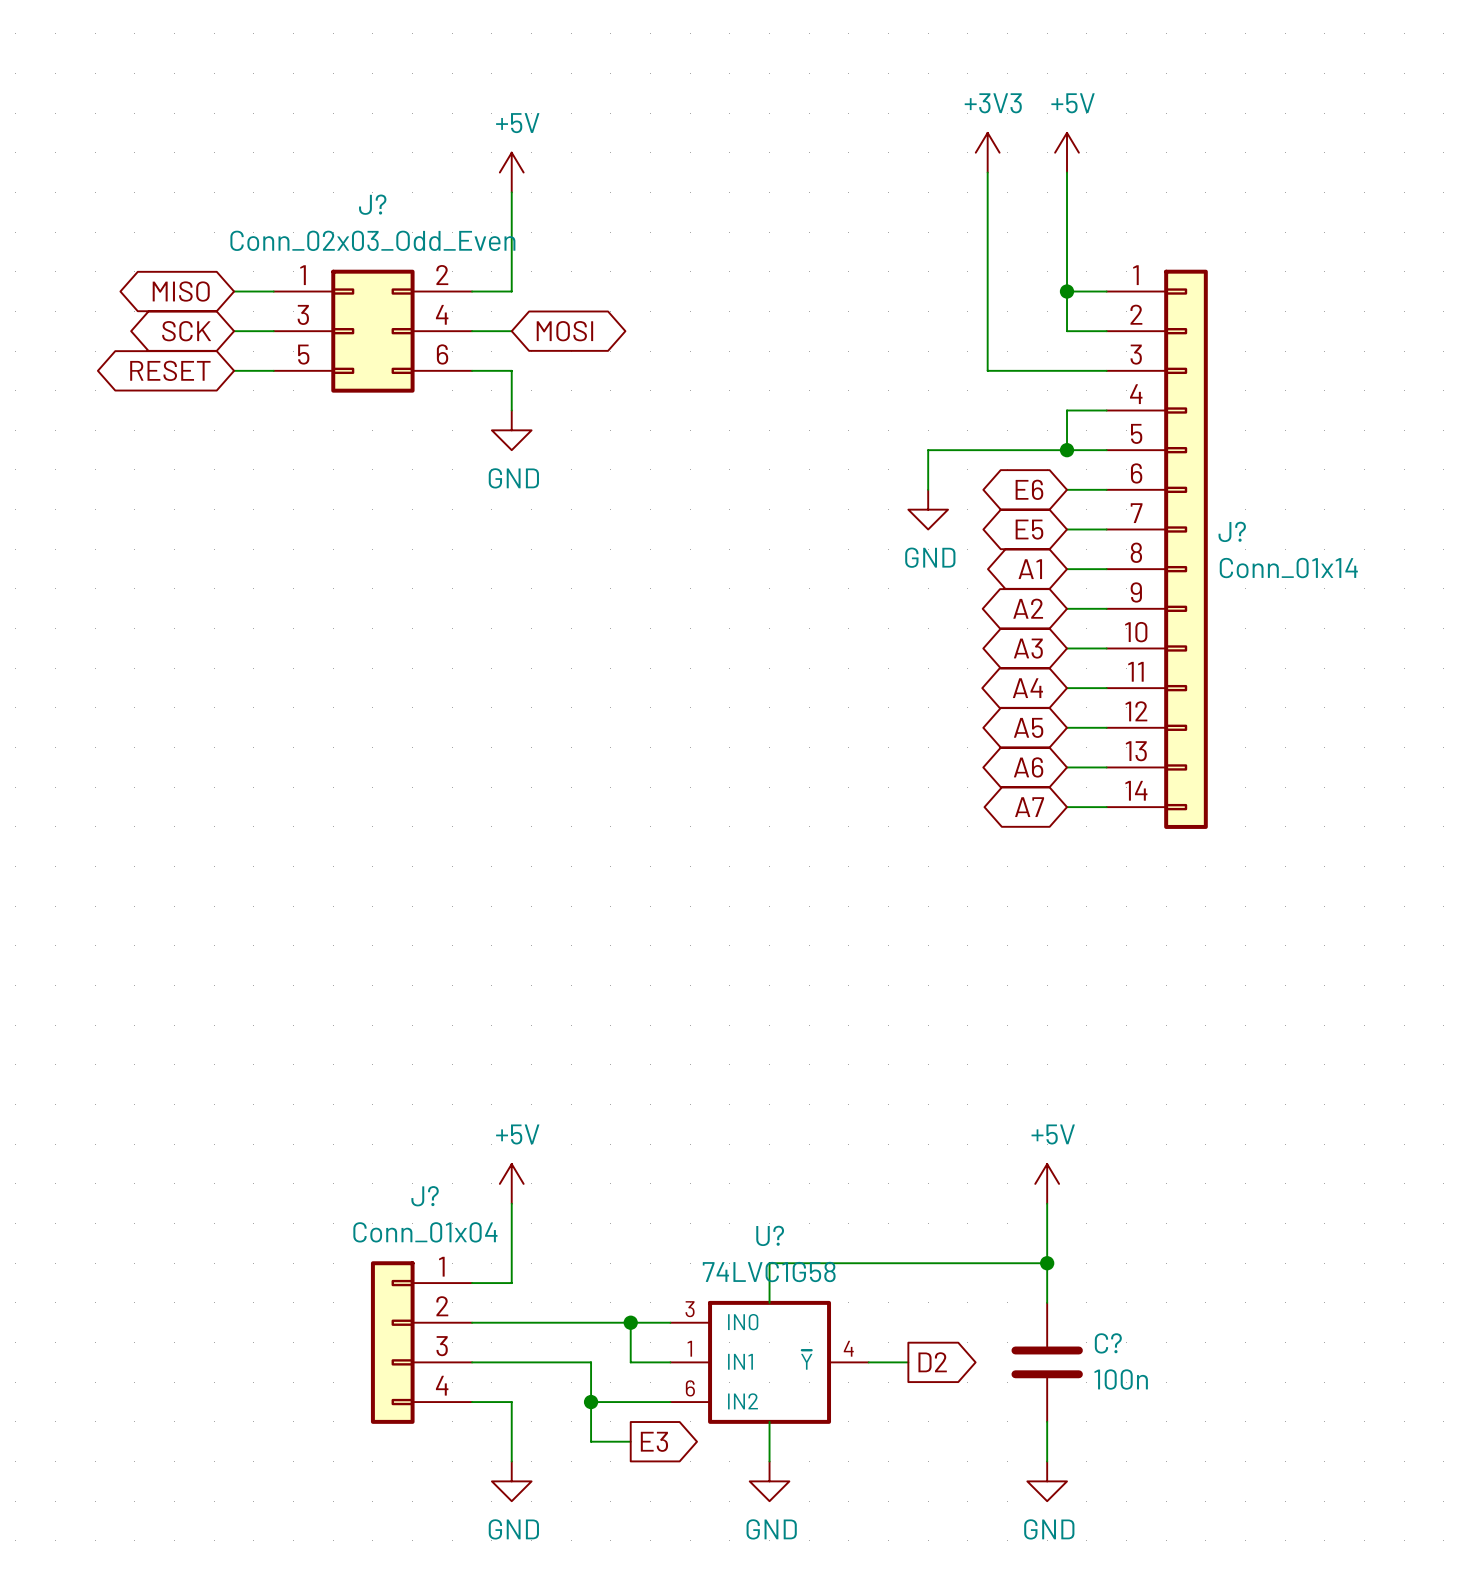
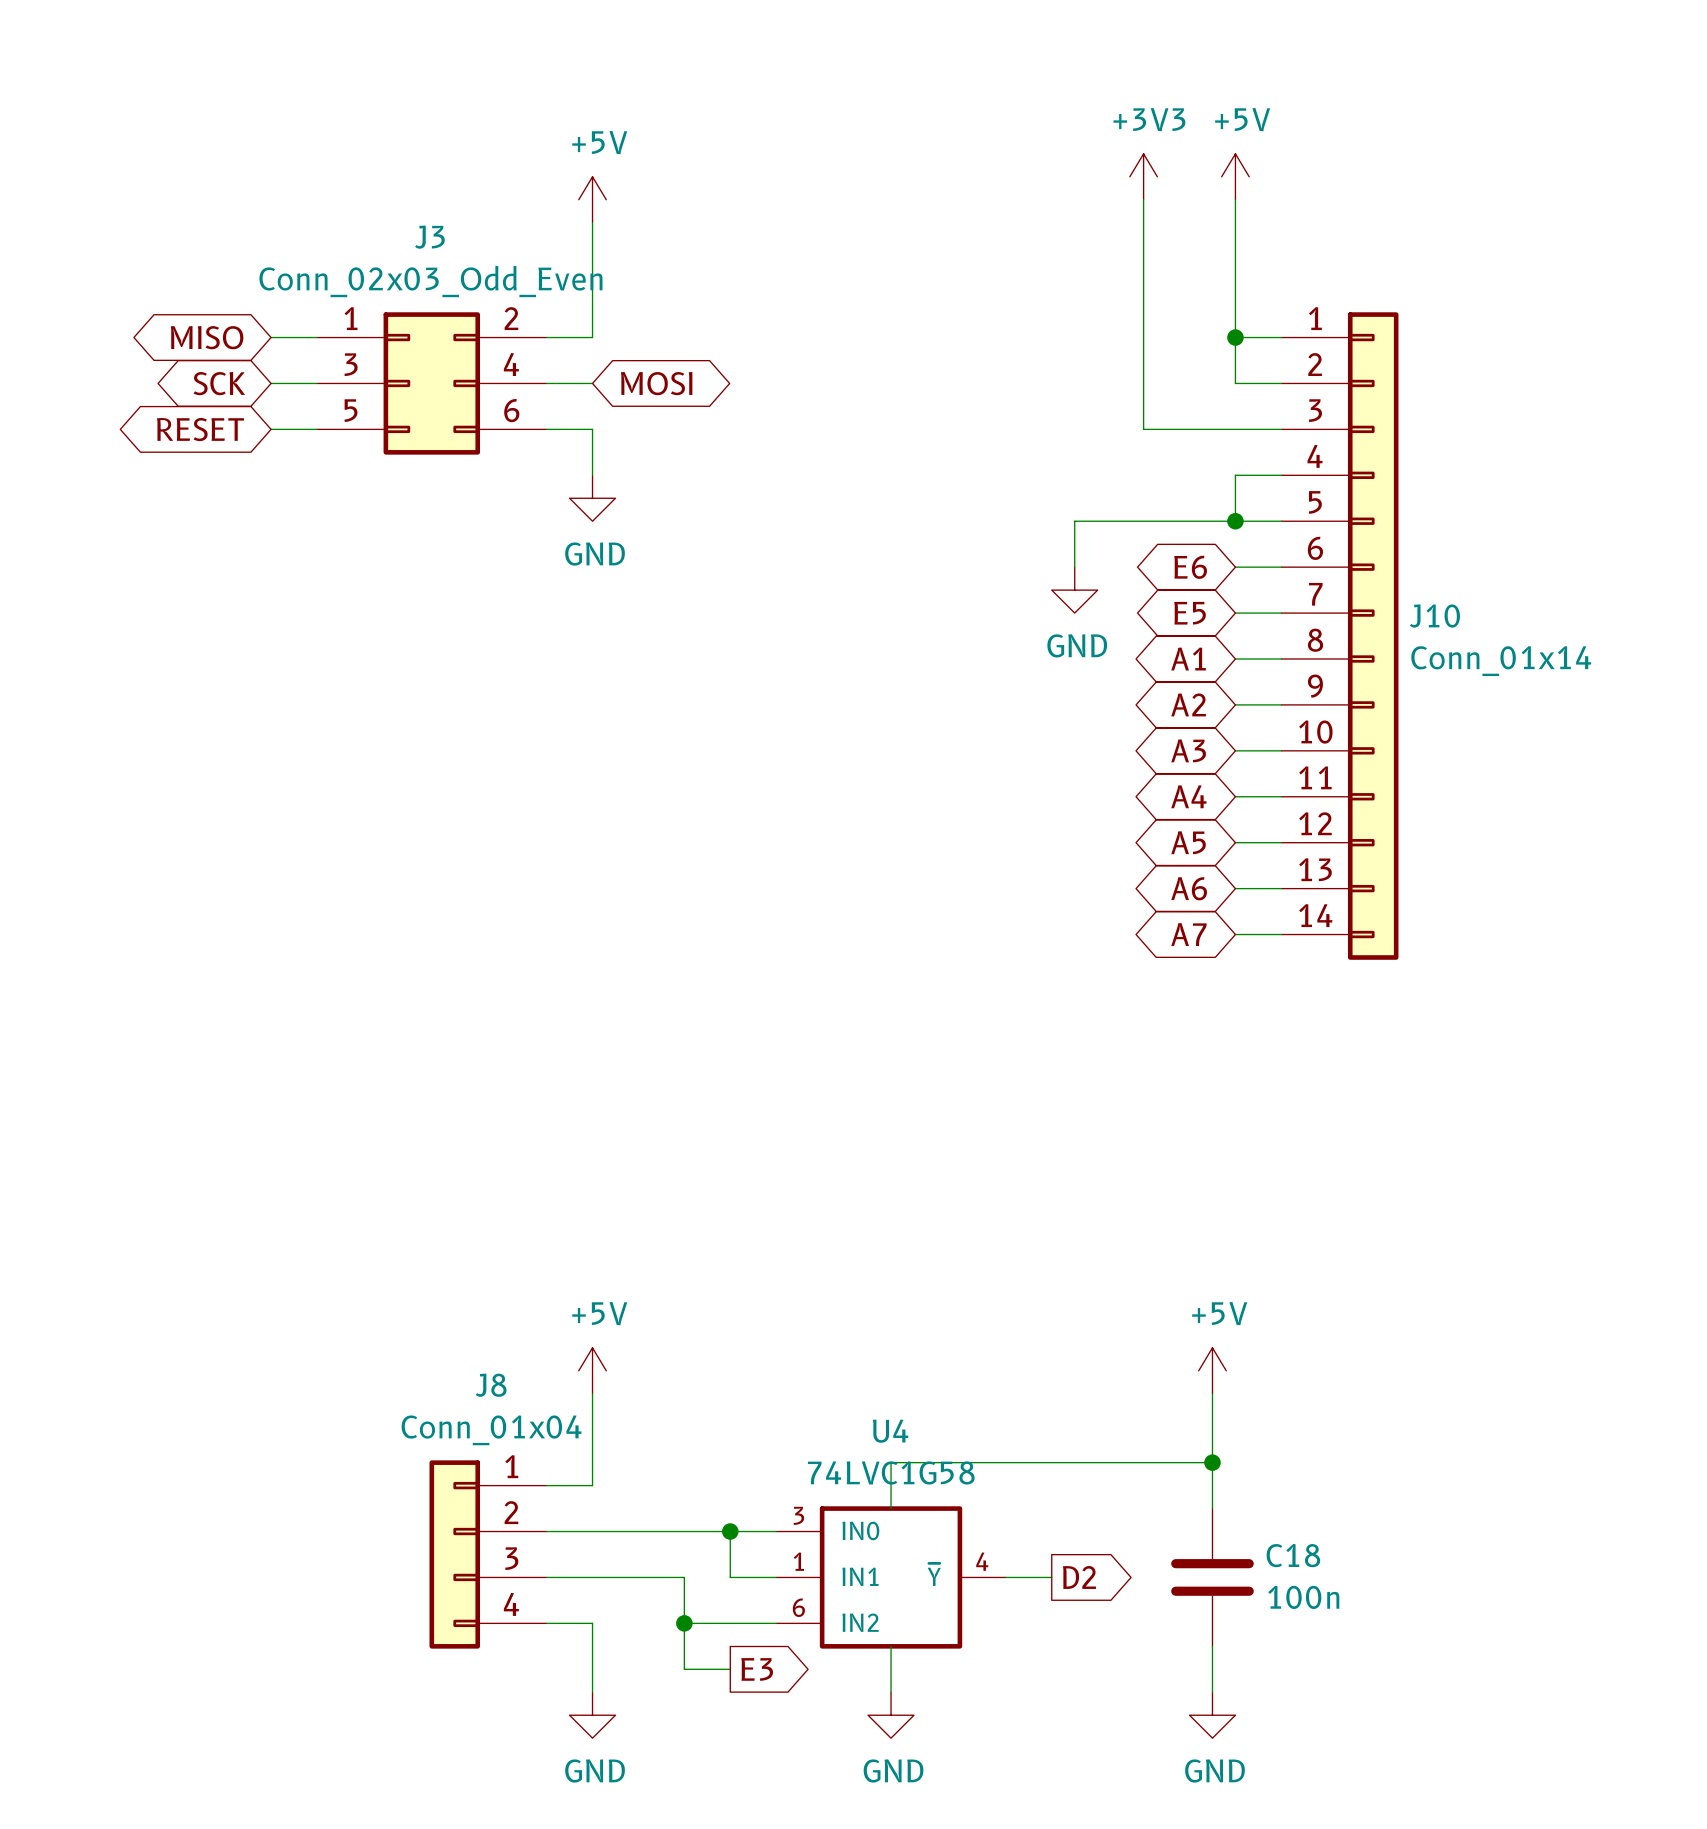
J? name: J? (372, 204) -> J3 (429, 237)
J? name: J? (1232, 531) -> J10 (1434, 616)
J? name: J? (425, 1196) -> J8 (491, 1385)
U? name: U? (770, 1235) -> U4 (890, 1431)
C? name: C? (1108, 1343) -> C18 (1293, 1555)

